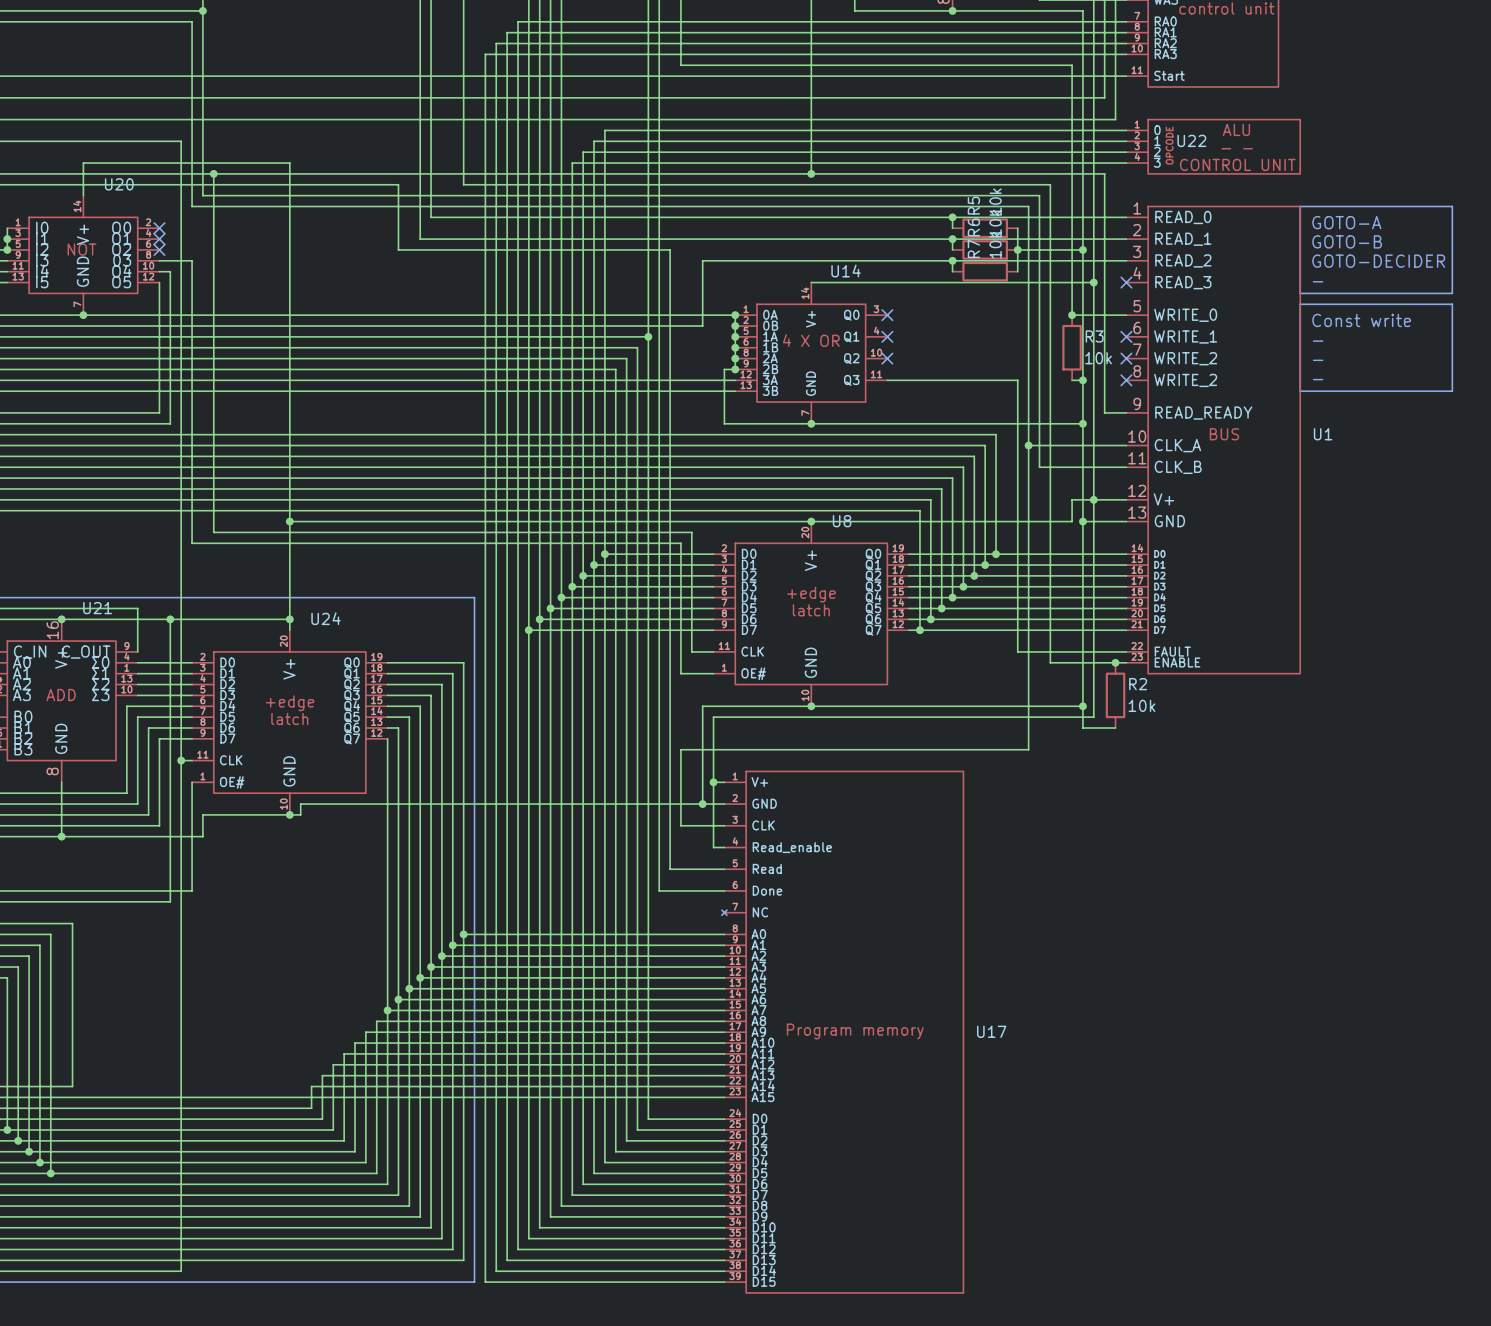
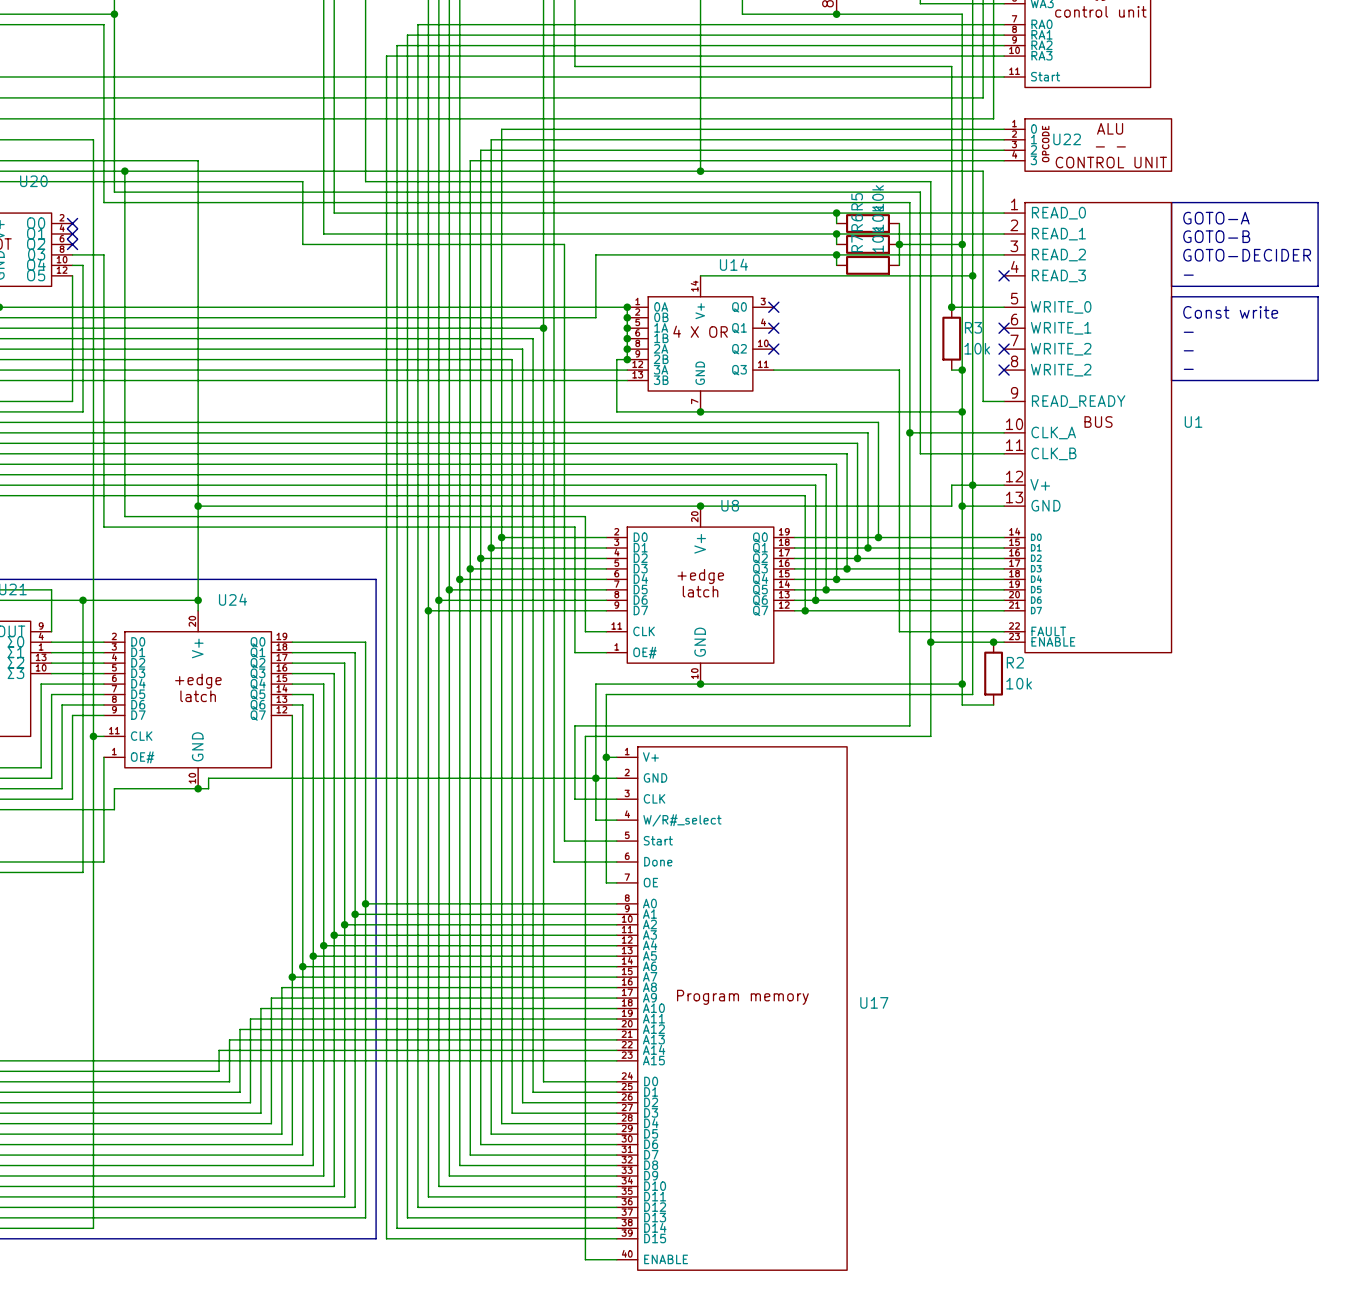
wire: none -> (930, 642) (930, 736) (585, 736) (585, 1259) (616, 1259)
junction: none -> (930, 642)
U17 symbol: [721, 771, 964, 1293] -> [616, 746, 848, 1271]
wire: none -> (595, 778) (595, 820) (606, 820) (606, 882) (616, 882)

